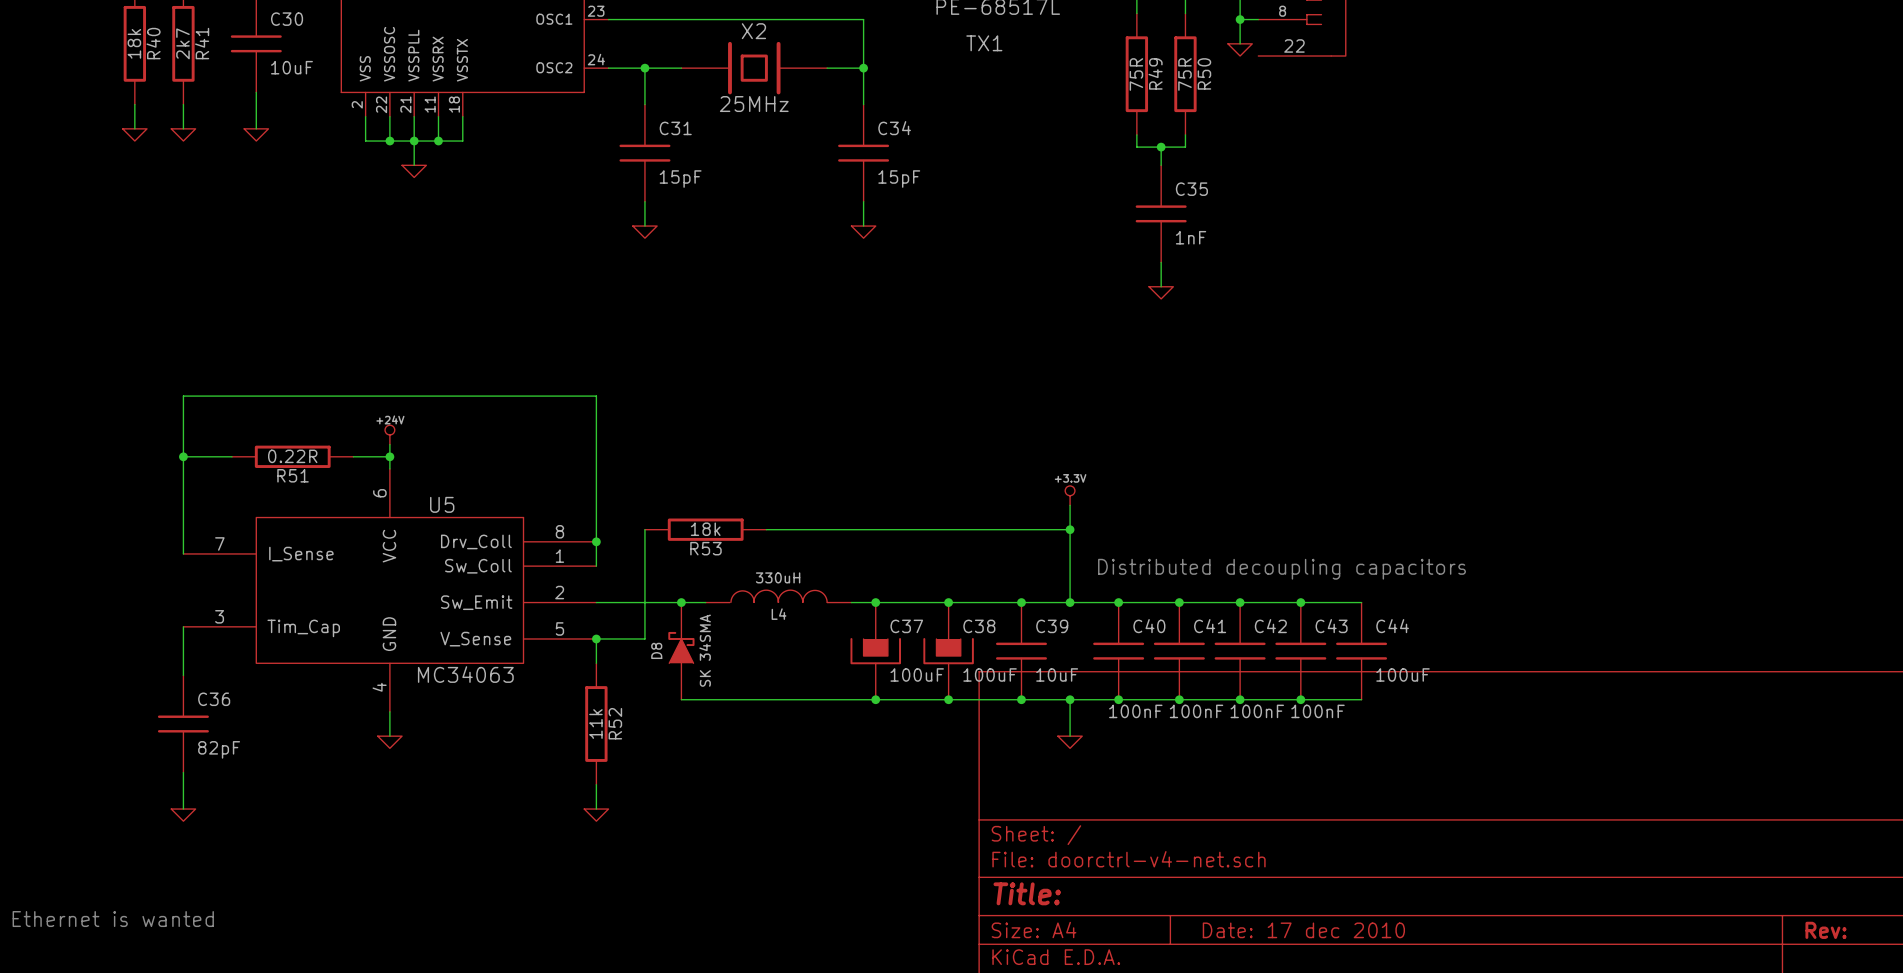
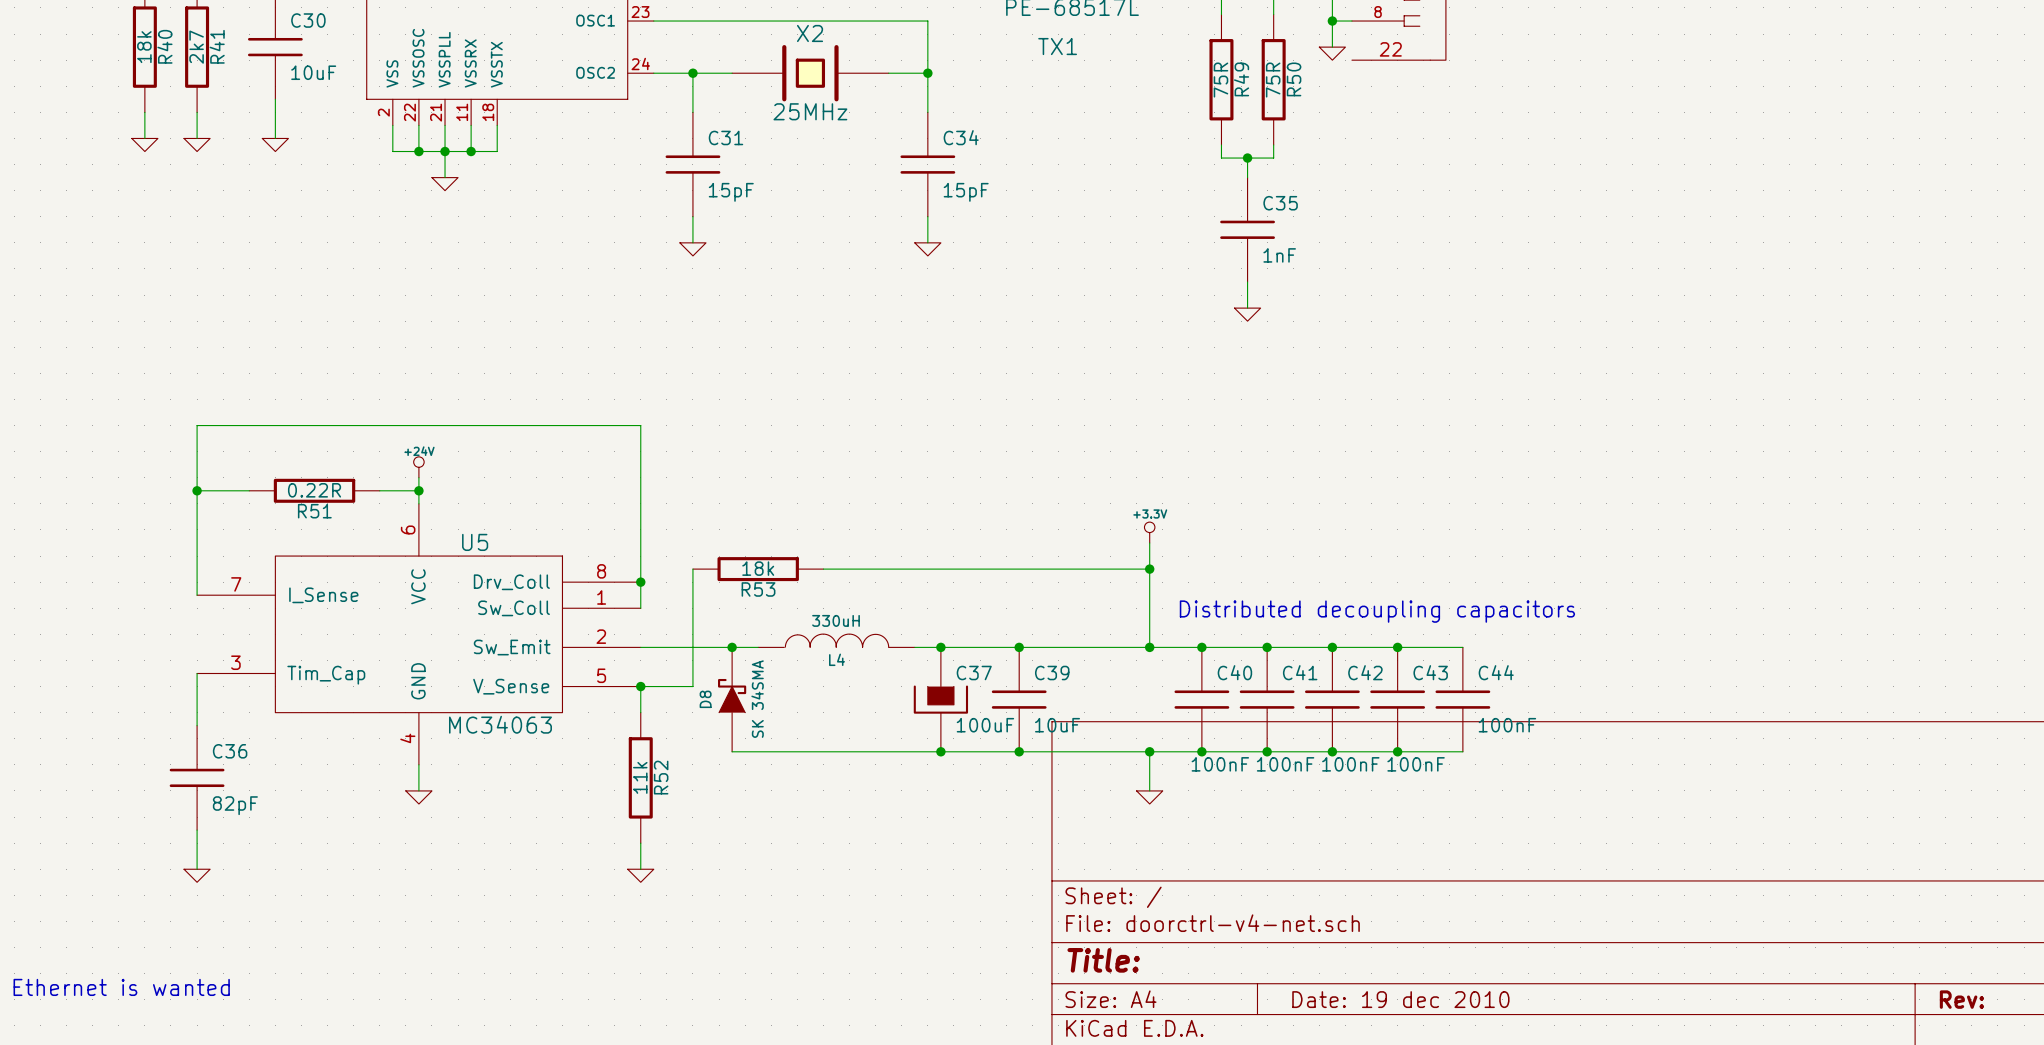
junction: (1021, 602) -> none
C38: 100uF (948, 651) -> none
C39 position: (1021, 651) -> (1019, 699)
C44 value: 100uF (1403, 674) -> 100nF (1507, 725)
junction: (1021, 699) -> none
title block: Date: 17 dec 2010 (1303, 930) -> Date: 19 dec 2010 (1400, 999)

